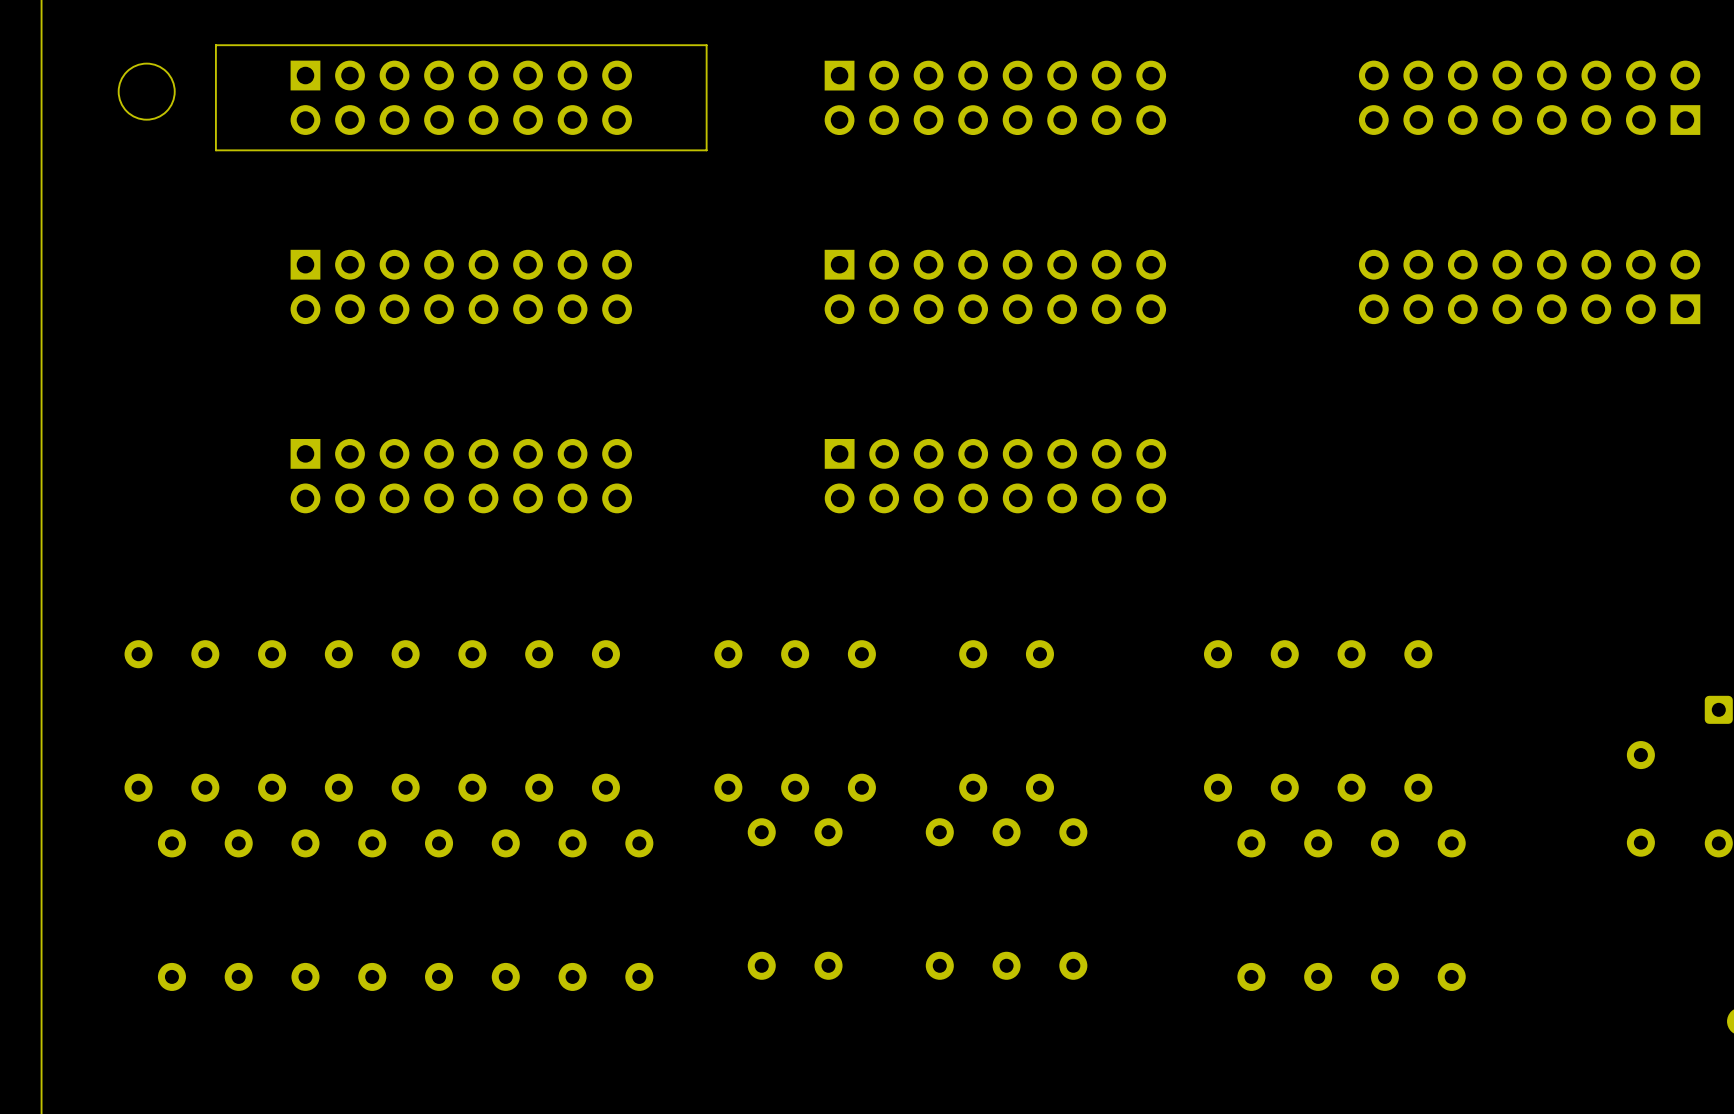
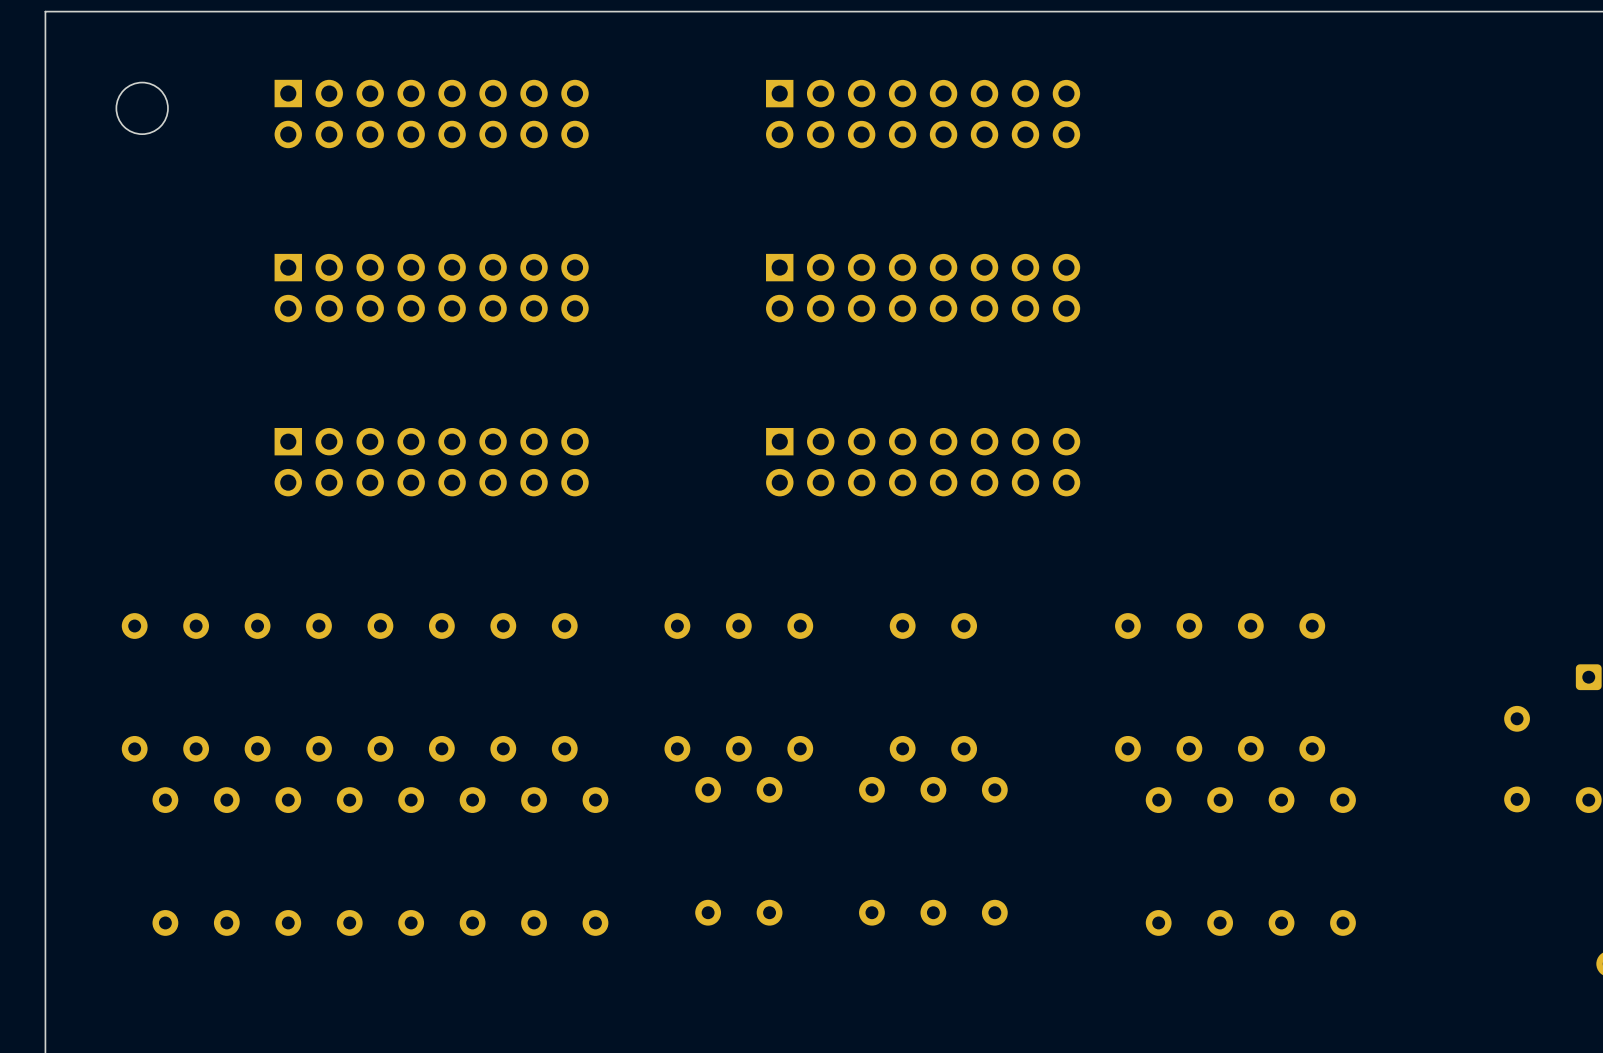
board edge: (706, 45) (215, 45) (215, 150) (706, 150) (706, 45) -> none
part: (1529, 97) -> none
part: (1529, 286) -> none

